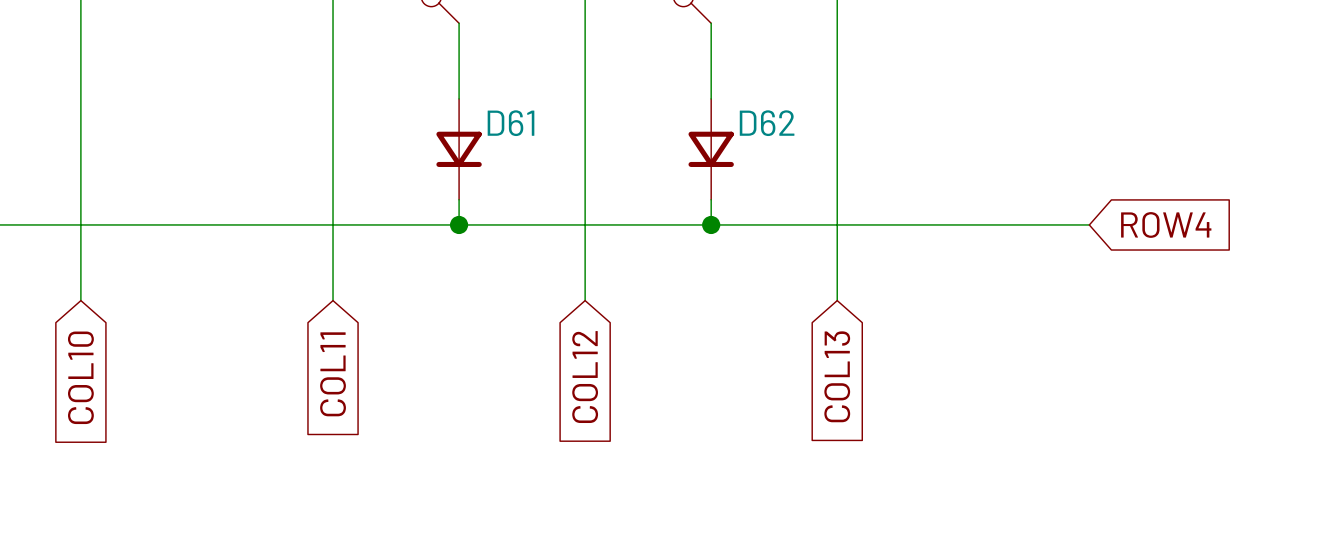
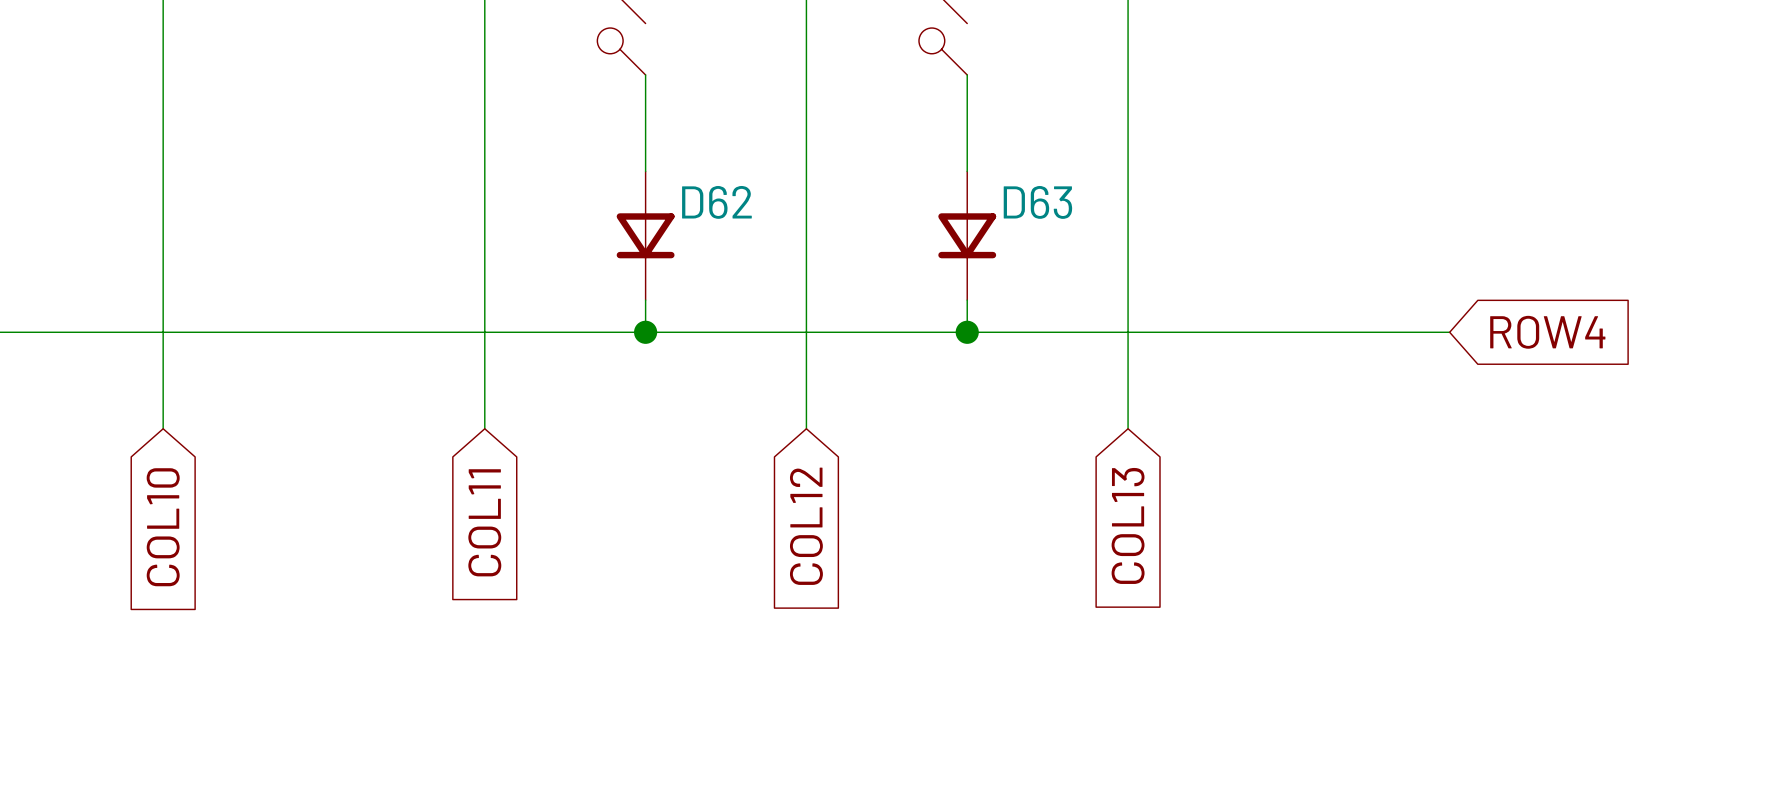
D61 name: D61 (511, 123) -> D62 (716, 202)
D62 name: D62 (767, 123) -> D63 (1037, 202)

